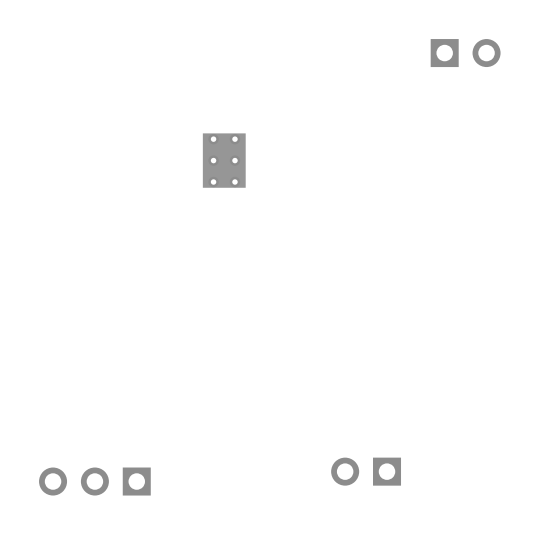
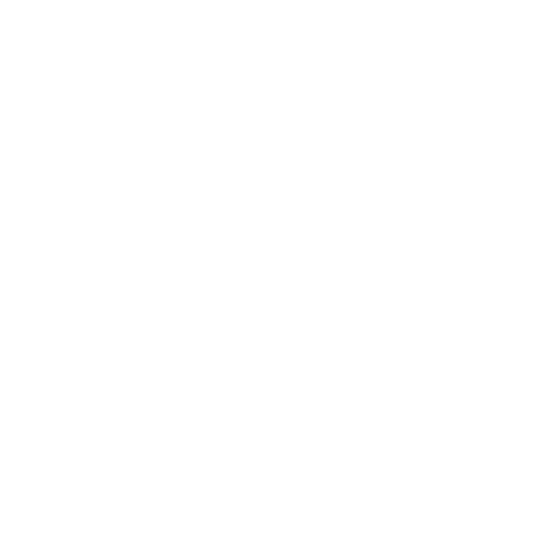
part: (465, 53) -> none
part: (224, 160) -> none
part: (366, 471) -> none
part: (94, 481) -> none

